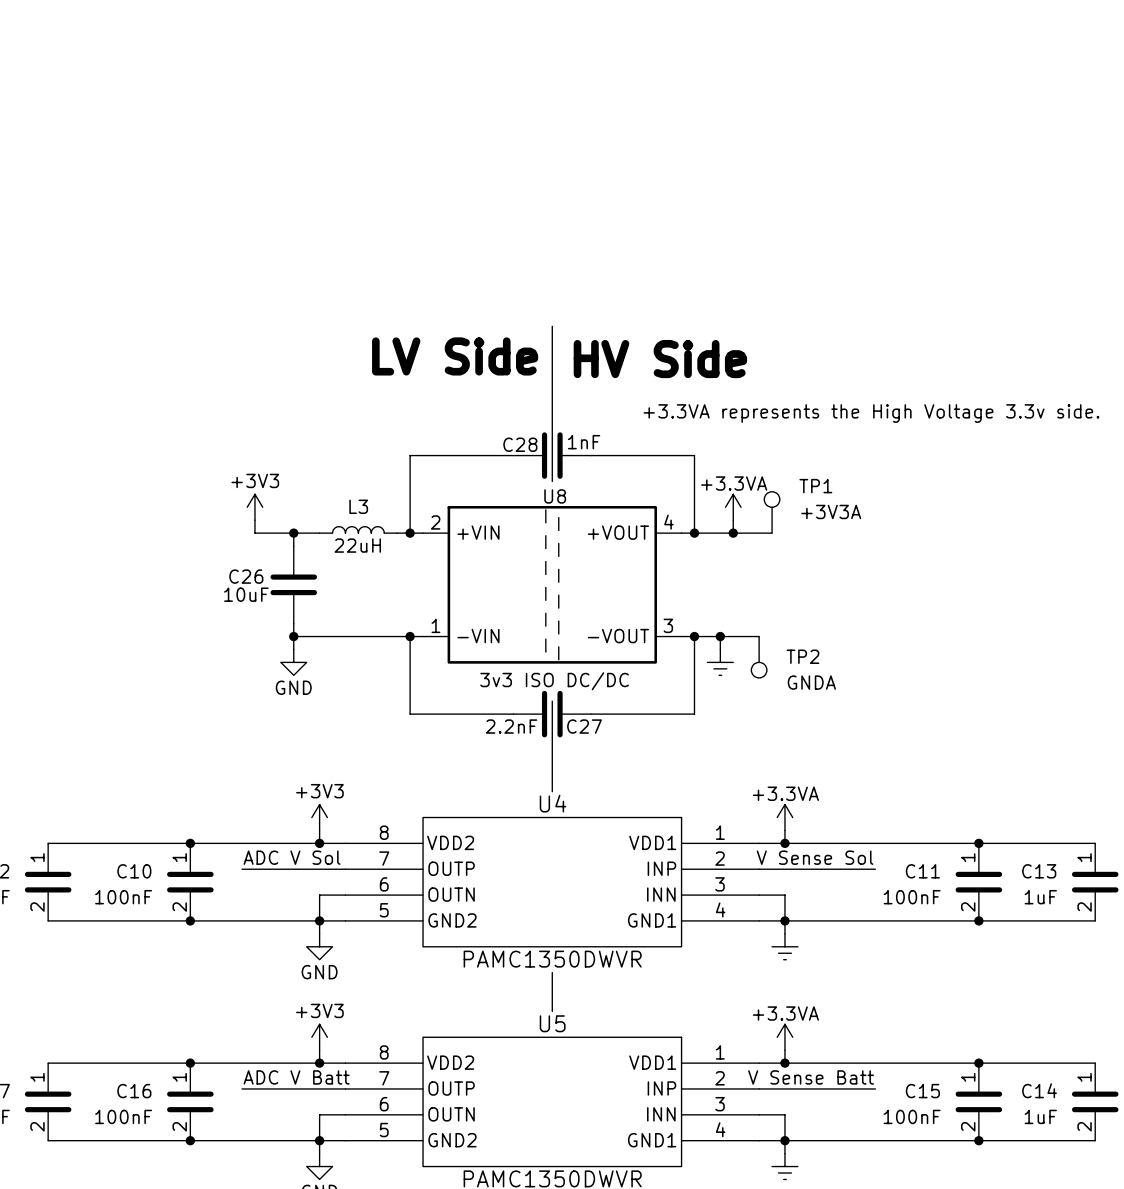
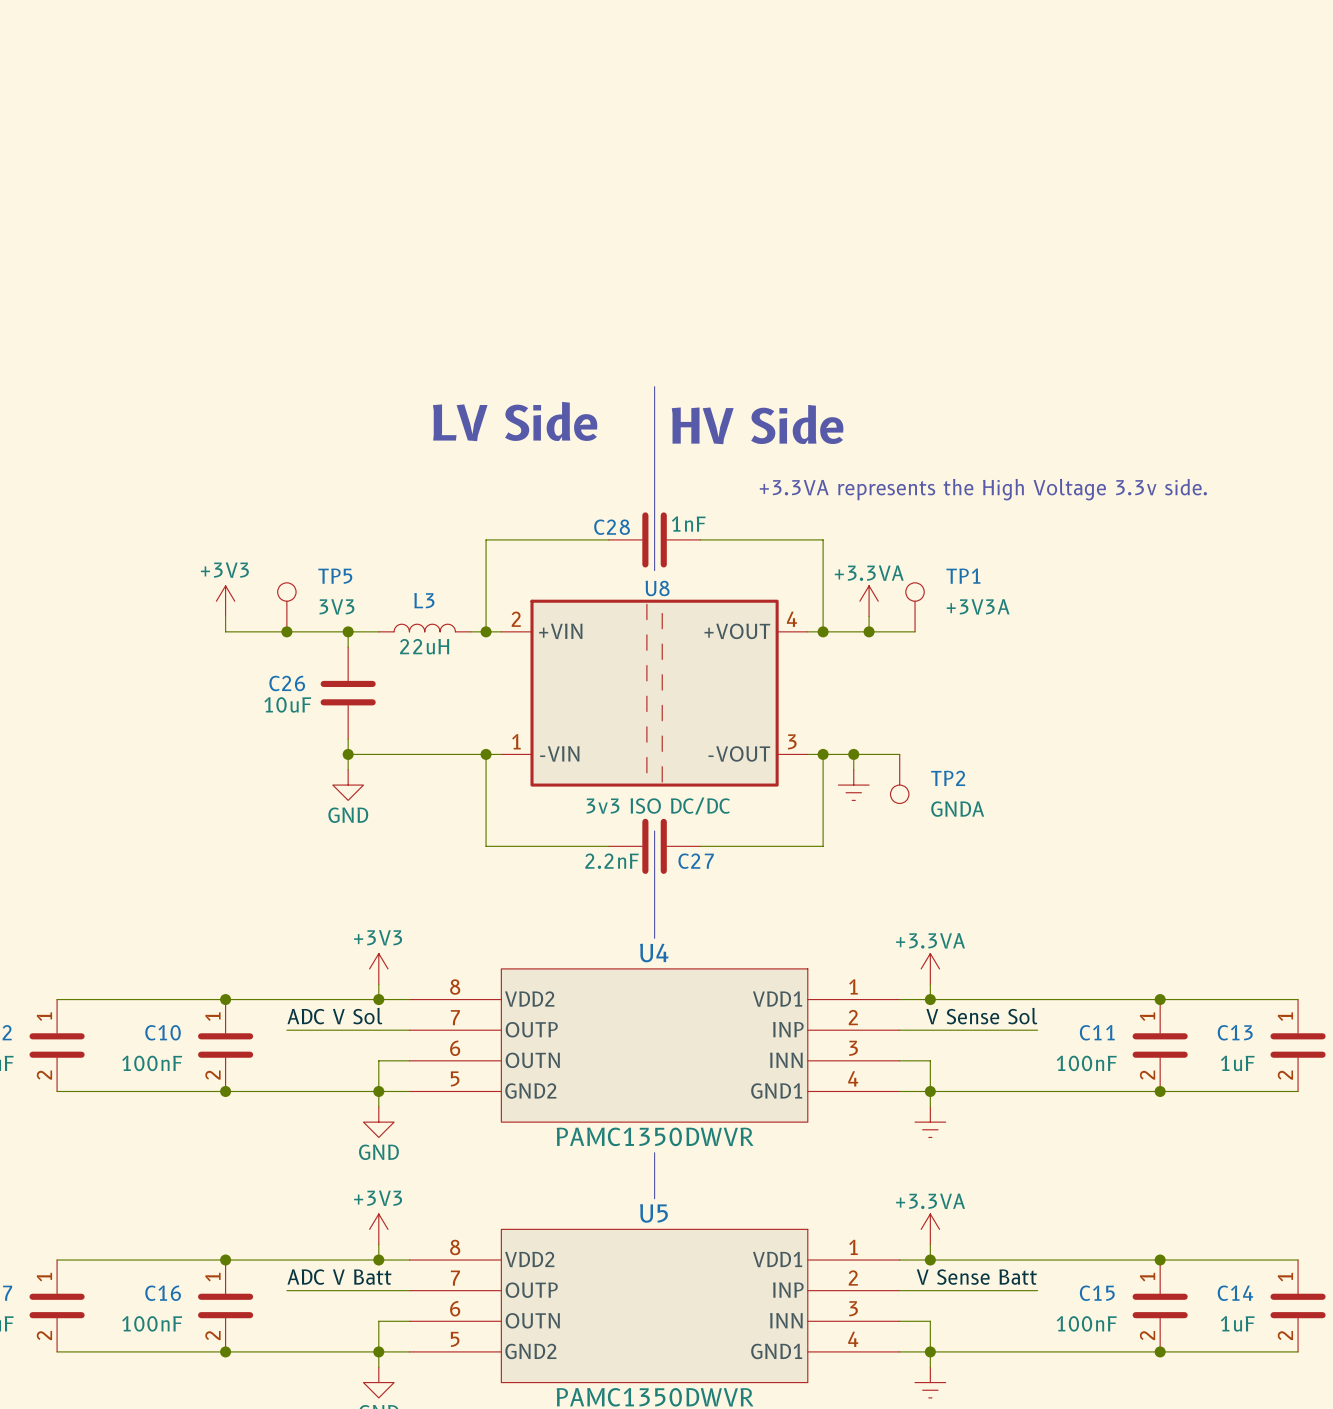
power symbol position: +3V3 (254, 507) -> +3V3 (225, 601)
TP5: none -> 3V3 (286, 607)
wire: (254, 520) (254, 533) -> (225, 616) (225, 631) (302, 631)
junction: none -> (286, 631)

